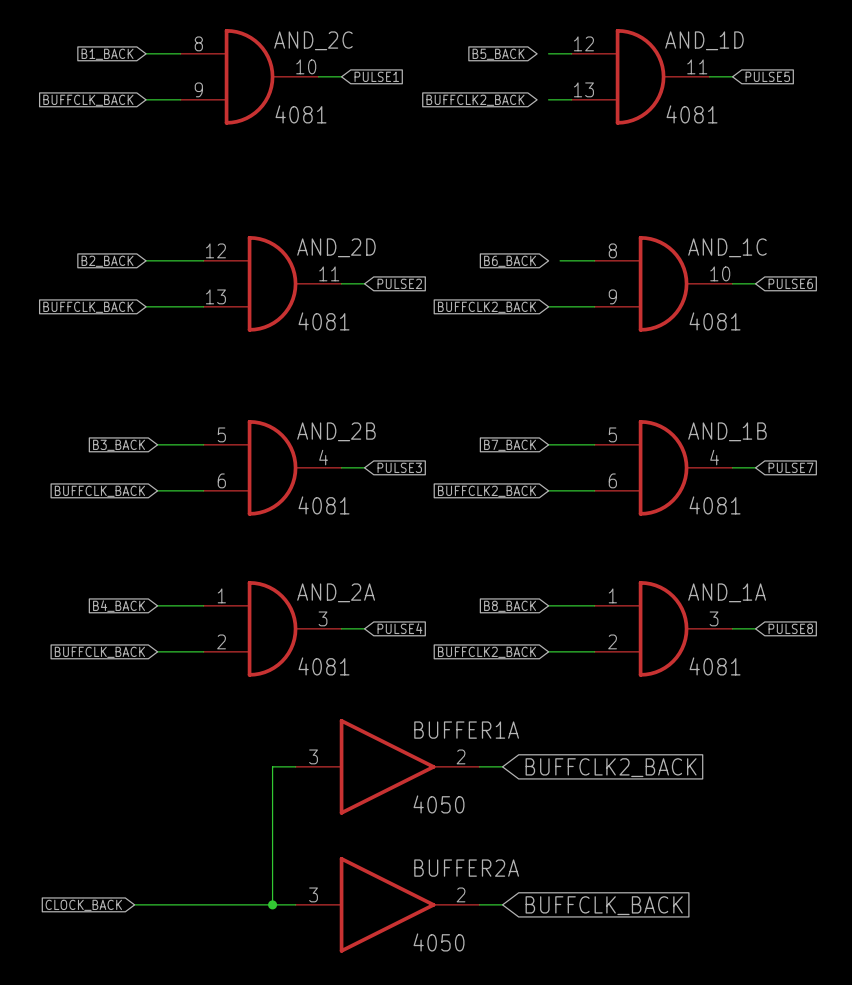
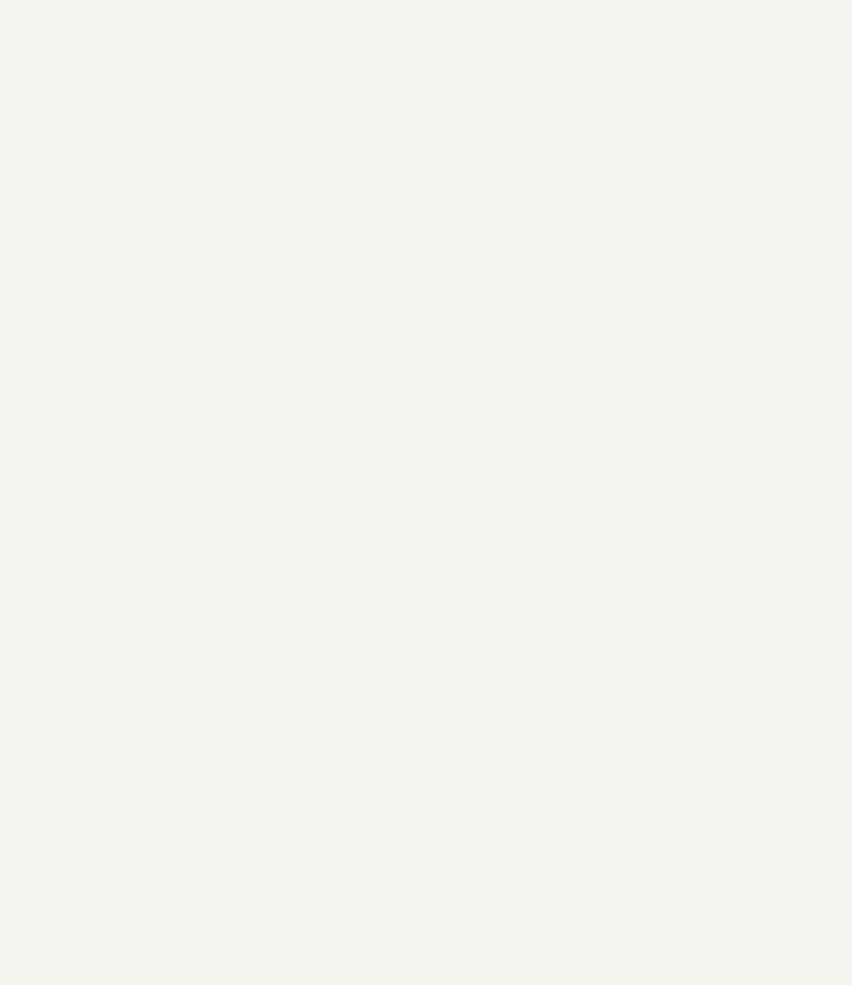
wire: (146, 53) (180, 53) -> none
wire: (548, 53) (571, 53) -> none
global label: B1_BACK (107, 54) -> none
global label: B5_BACK (498, 54) -> none
AND_2C: 4081 (249, 76) -> none
wire: (318, 76) (341, 76) -> none
global label: PULSE1 (376, 76) -> none
AND_1D: 4081 (640, 76) -> none
wire: (709, 76) (732, 76) -> none
global label: PULSE5 (767, 76) -> none
wire: (146, 99) (180, 99) -> none
wire: (548, 99) (571, 99) -> none
global label: BUFFCLK_BACK (88, 100) -> none
global label: BUFFCLK2_BACK (475, 100) -> none
wire: (146, 260) (203, 260) -> none
wire: (560, 260) (594, 260) -> none
global label: B2_BACK (107, 261) -> none
global label: B6_BACK (510, 261) -> none
AND_2D: 4081 (272, 283) -> none
wire: (341, 283) (364, 283) -> none
global label: PULSE2 (399, 283) -> none
AND_1C: 4081 (663, 283) -> none
wire: (732, 283) (755, 283) -> none
global label: PULSE6 (790, 283) -> none
wire: (146, 306) (203, 306) -> none
wire: (548, 306) (594, 306) -> none
global label: BUFFCLK_BACK (88, 307) -> none
global label: BUFFCLK2_BACK (486, 307) -> none
wire: (157, 444) (203, 444) -> none
wire: (548, 444) (594, 444) -> none
global label: B3_BACK (119, 445) -> none
global label: B7_BACK (510, 445) -> none
AND_2B: 4081 (272, 467) -> none
wire: (341, 467) (364, 467) -> none
global label: PULSE3 (399, 467) -> none
AND_1B: 4081 (663, 467) -> none
wire: (732, 467) (755, 467) -> none
global label: PULSE7 (790, 467) -> none
wire: (157, 490) (203, 490) -> none
wire: (548, 490) (594, 490) -> none
global label: BUFFCLK_BACK (99, 491) -> none
global label: BUFFCLK2_BACK (486, 491) -> none
wire: (157, 605) (203, 605) -> none
wire: (548, 605) (594, 605) -> none
global label: B4_BACK (119, 606) -> none
global label: B8_BACK (510, 606) -> none
AND_2A: 4081 (272, 628) -> none
wire: (341, 628) (364, 628) -> none
global label: PULSE4 (399, 628) -> none
AND_1A: 4081 (663, 628) -> none
wire: (732, 628) (755, 628) -> none
global label: PULSE8 (790, 628) -> none
wire: (157, 651) (203, 651) -> none
wire: (548, 651) (594, 651) -> none
global label: BUFFCLK_BACK (99, 652) -> none
global label: BUFFCLK2_BACK (486, 652) -> none
wire: (295, 766) (272, 766) (272, 904) -> none
BUFFER1A: 4050 (387, 766) -> none
wire: (479, 766) (502, 766) -> none
global label: BUFFCLK2_BACK (611, 767) -> none
wire: (134, 904) (295, 904) -> none
junction: (272, 904) -> none
BUFFER2A: 4050 (387, 904) -> none
wire: (479, 904) (502, 904) -> none
global label: CLOCK_BACK (83, 905) -> none
global label: BUFFCLK_BACK (604, 905) -> none

